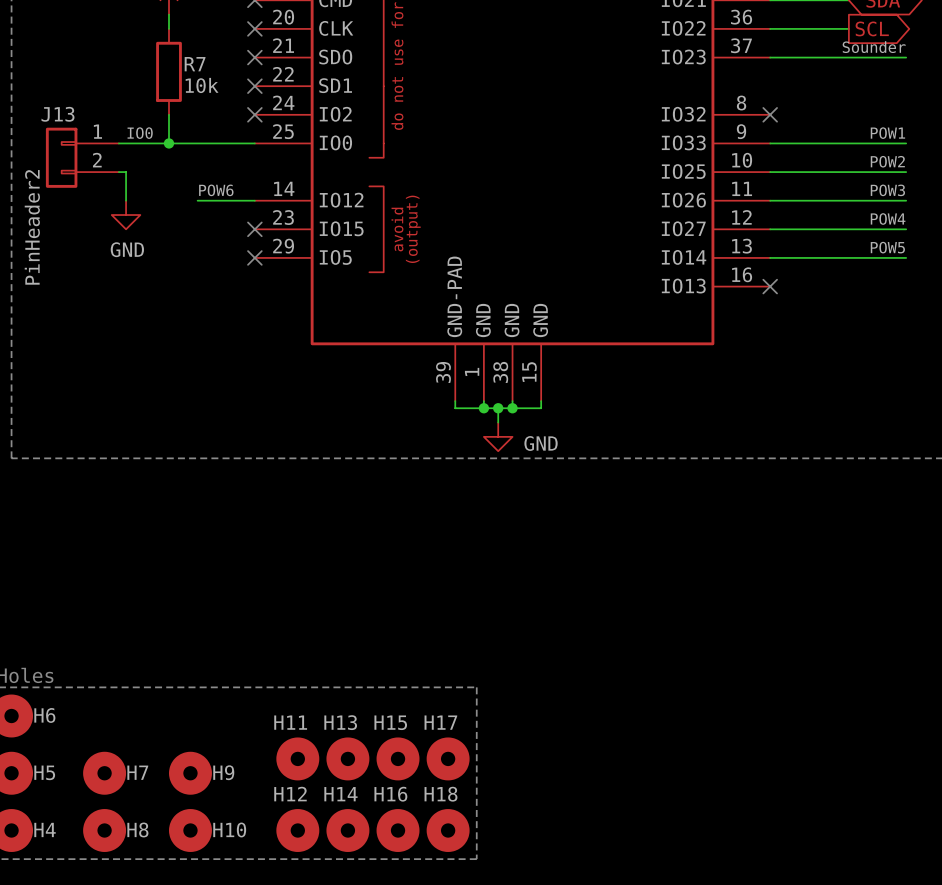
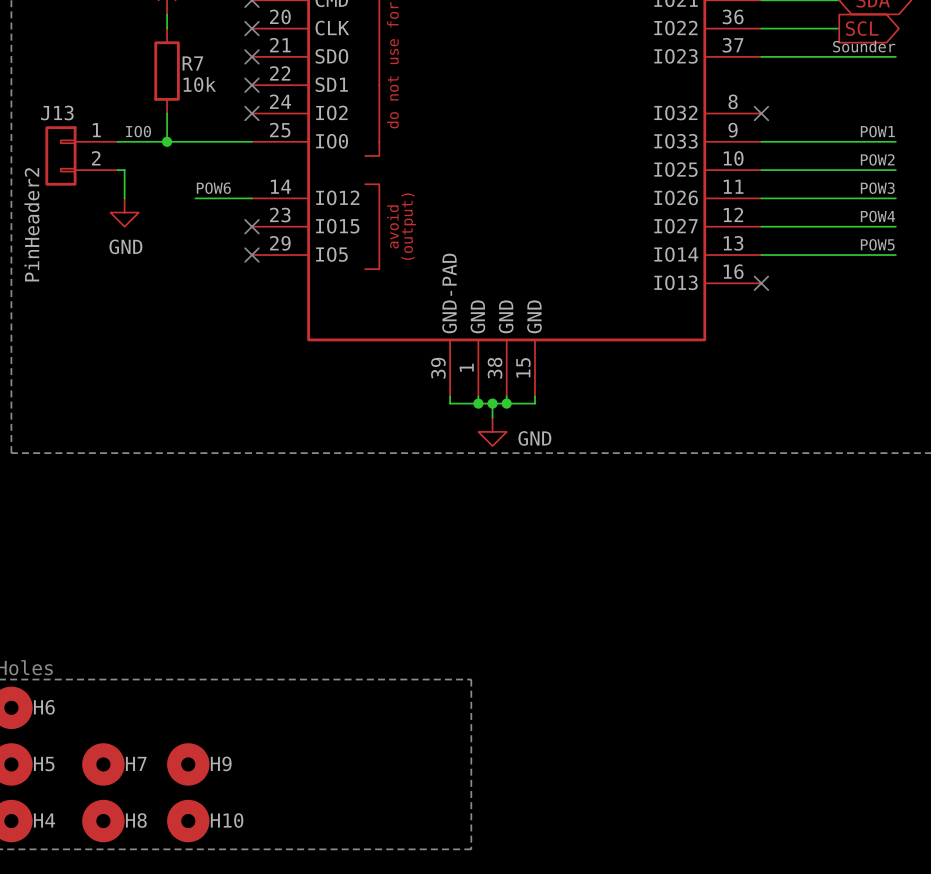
H11: (297, 758) -> none
H13: (347, 758) -> none
H15: (398, 758) -> none
H17: (448, 758) -> none
H12: (297, 830) -> none
H14: (347, 830) -> none
H16: (398, 830) -> none
H18: (448, 830) -> none

